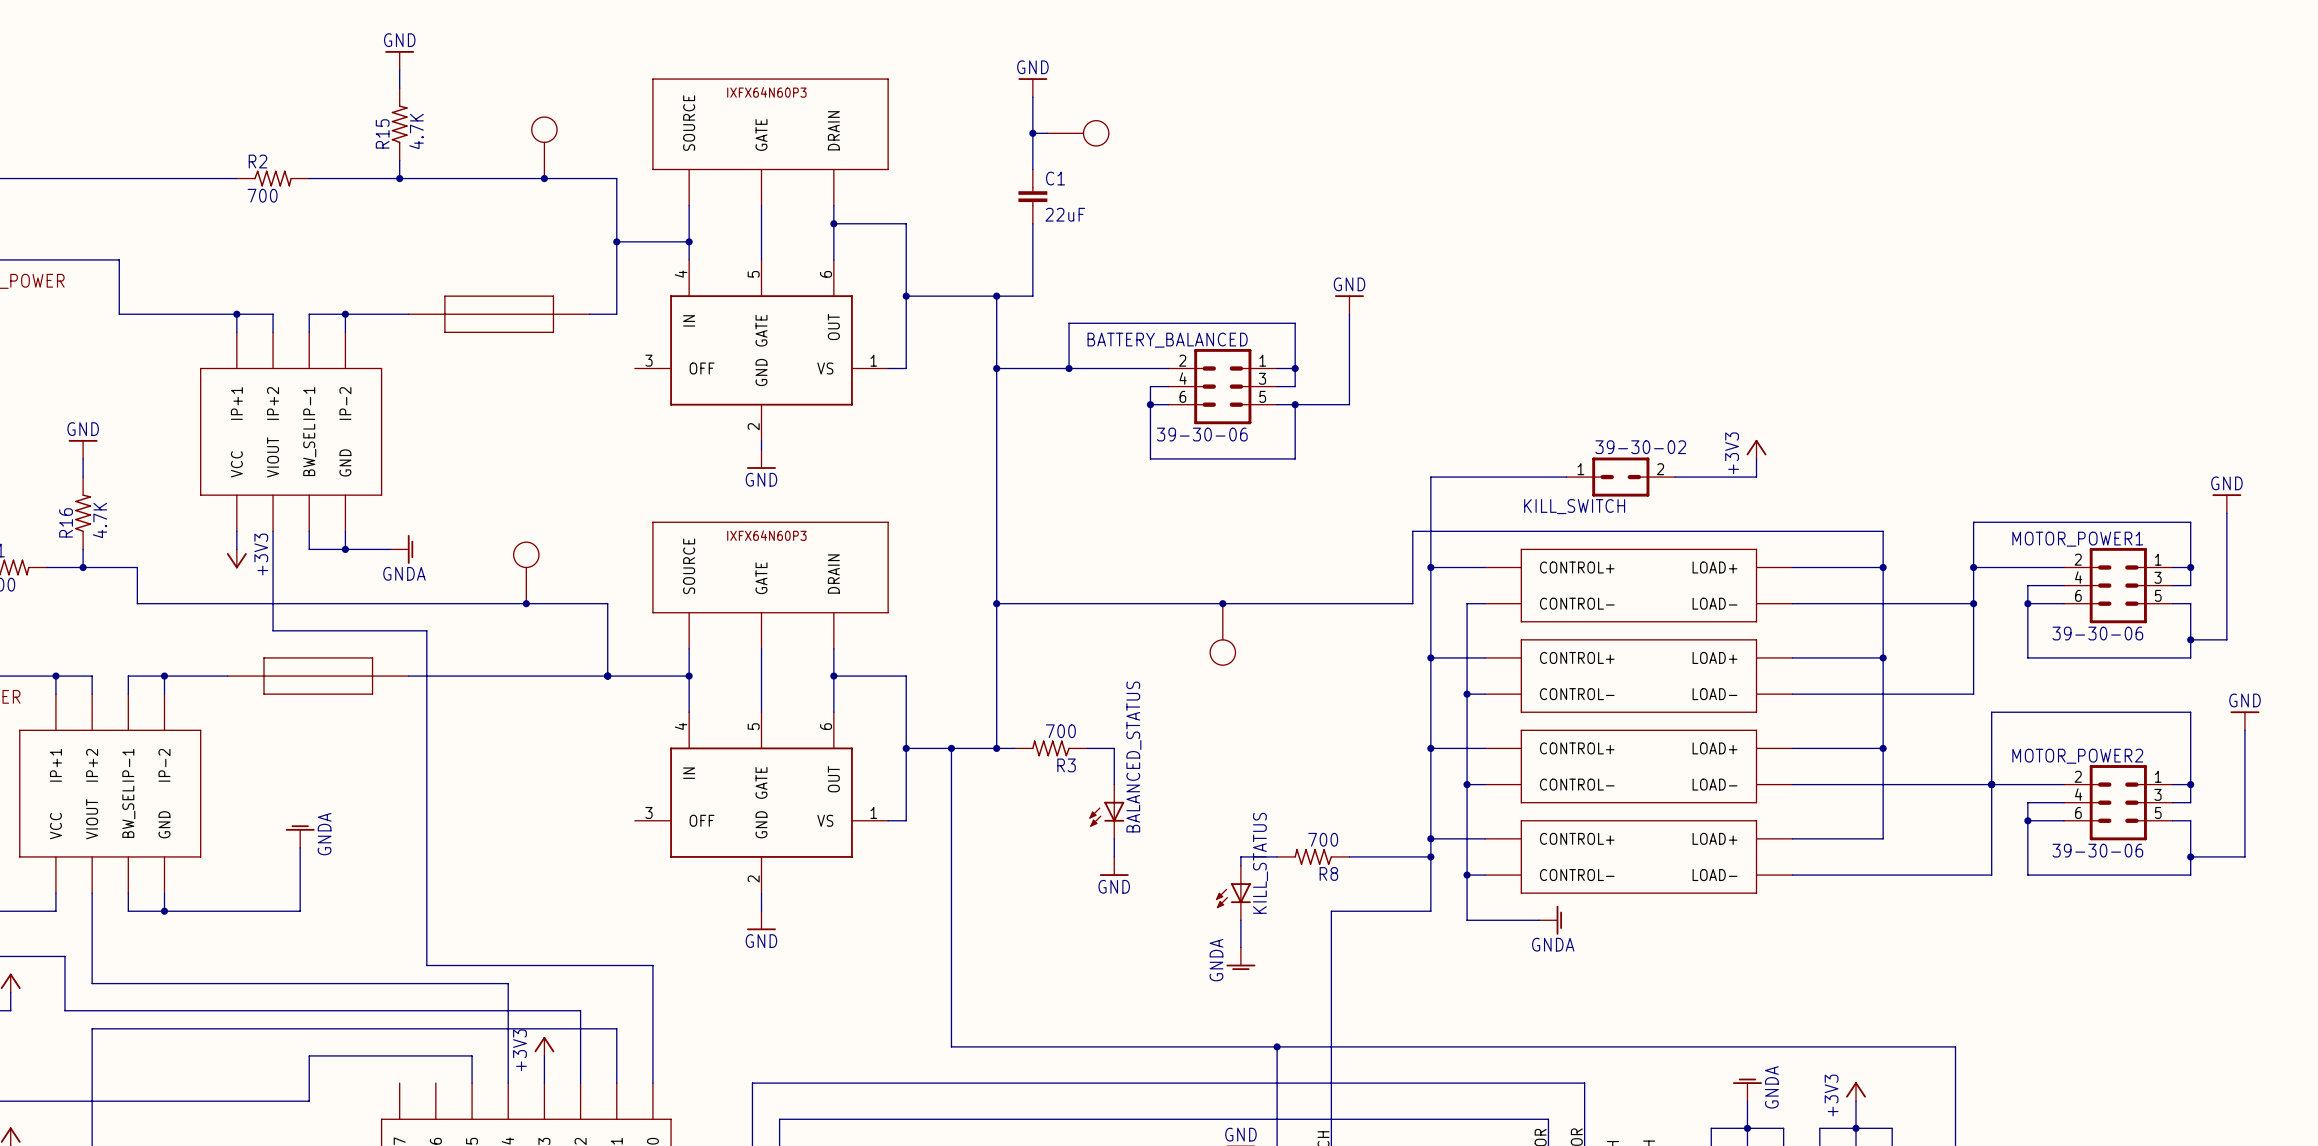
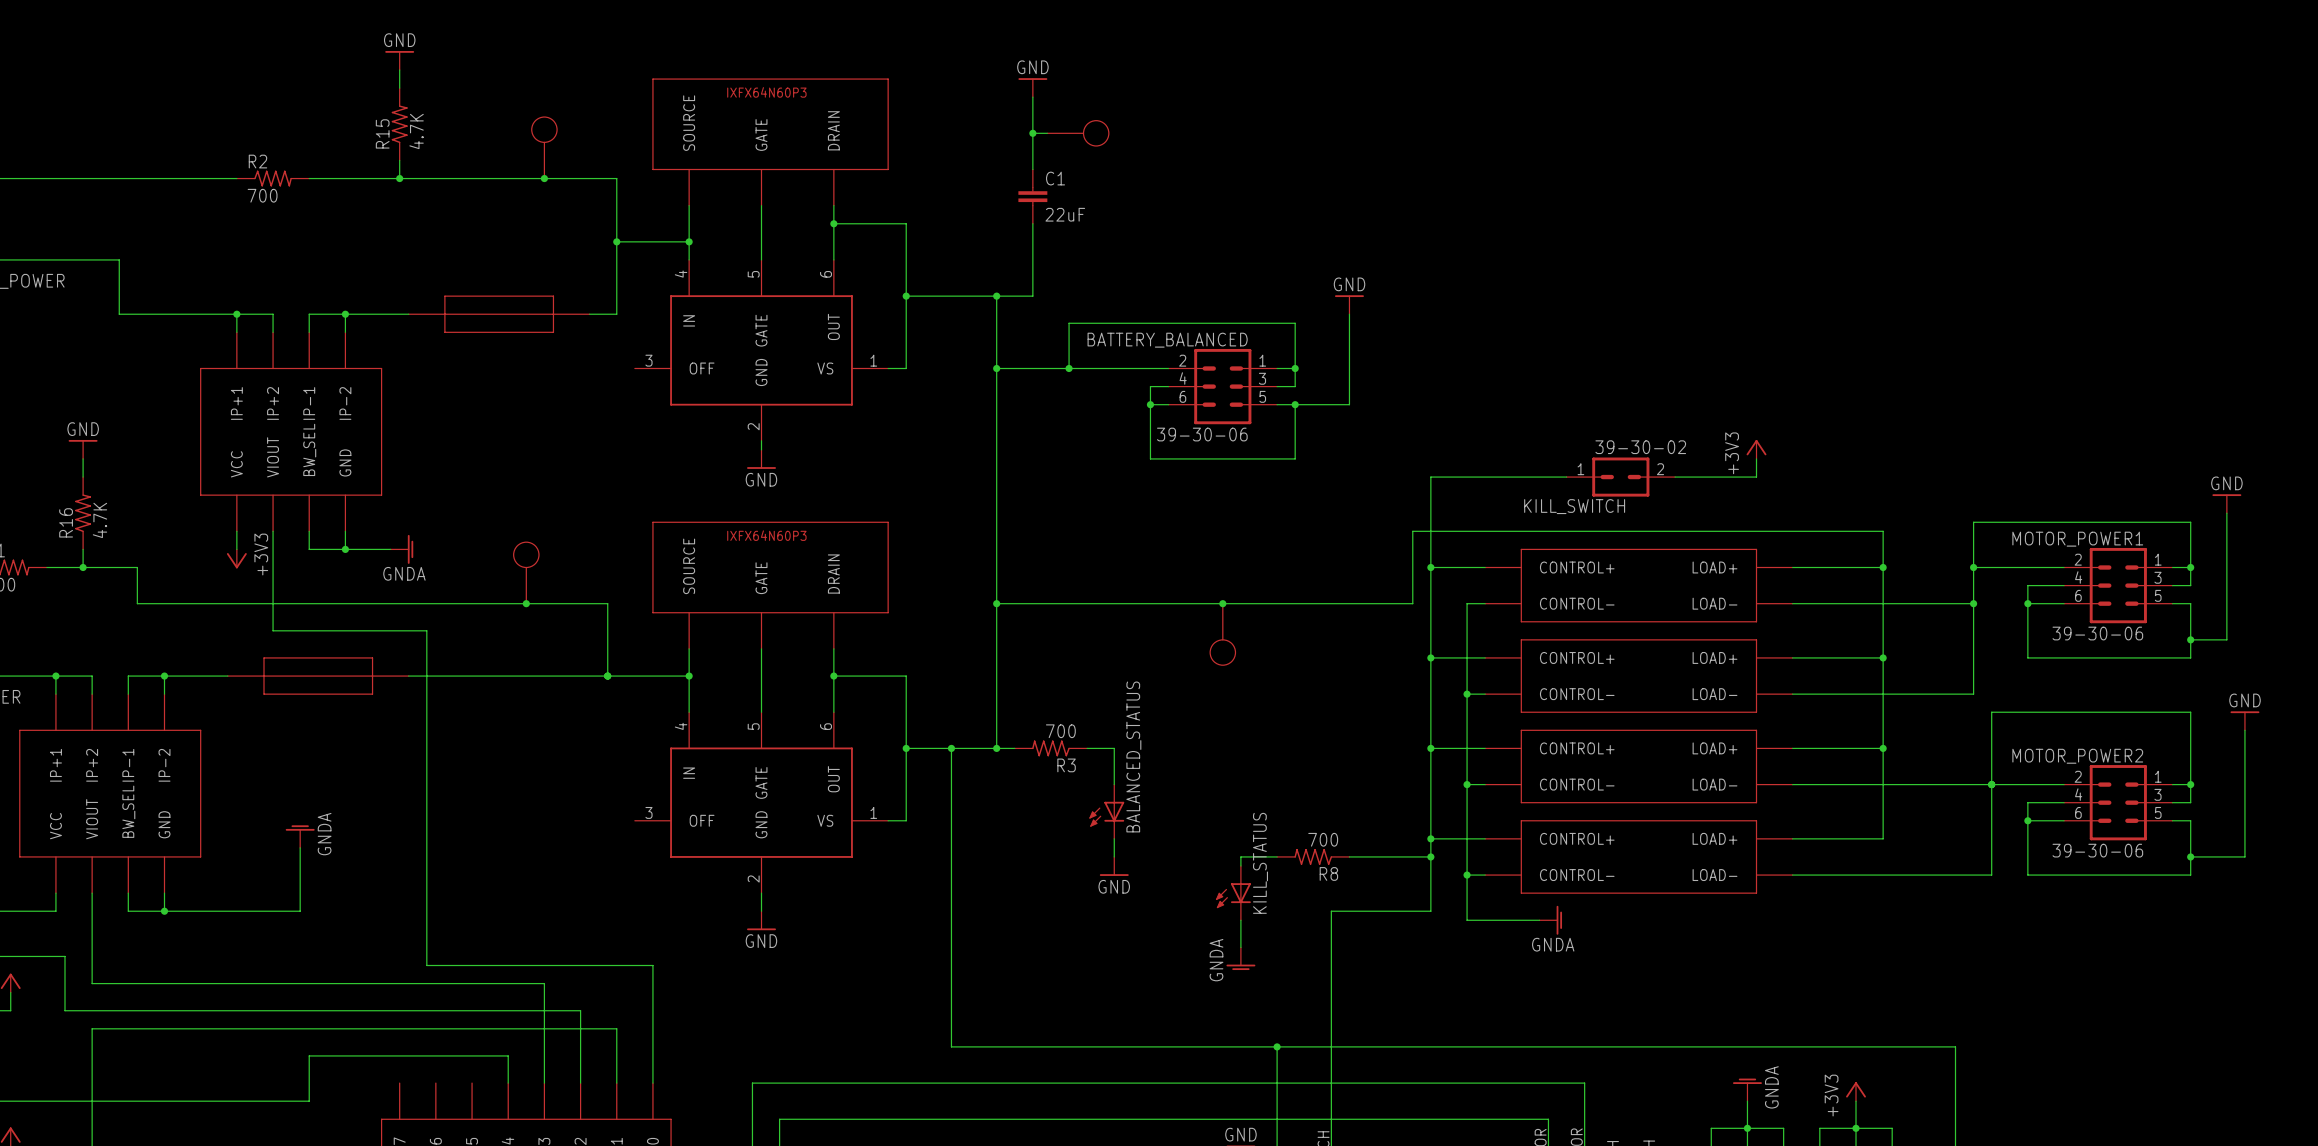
wire: (508, 983) (508, 1055) -> (508, 983) (544, 983) (544, 1055)
power symbol: +3V3 (544, 1046) -> none
wire: (472, 1055) (472, 1083) -> (472, 1055) (508, 1055)

